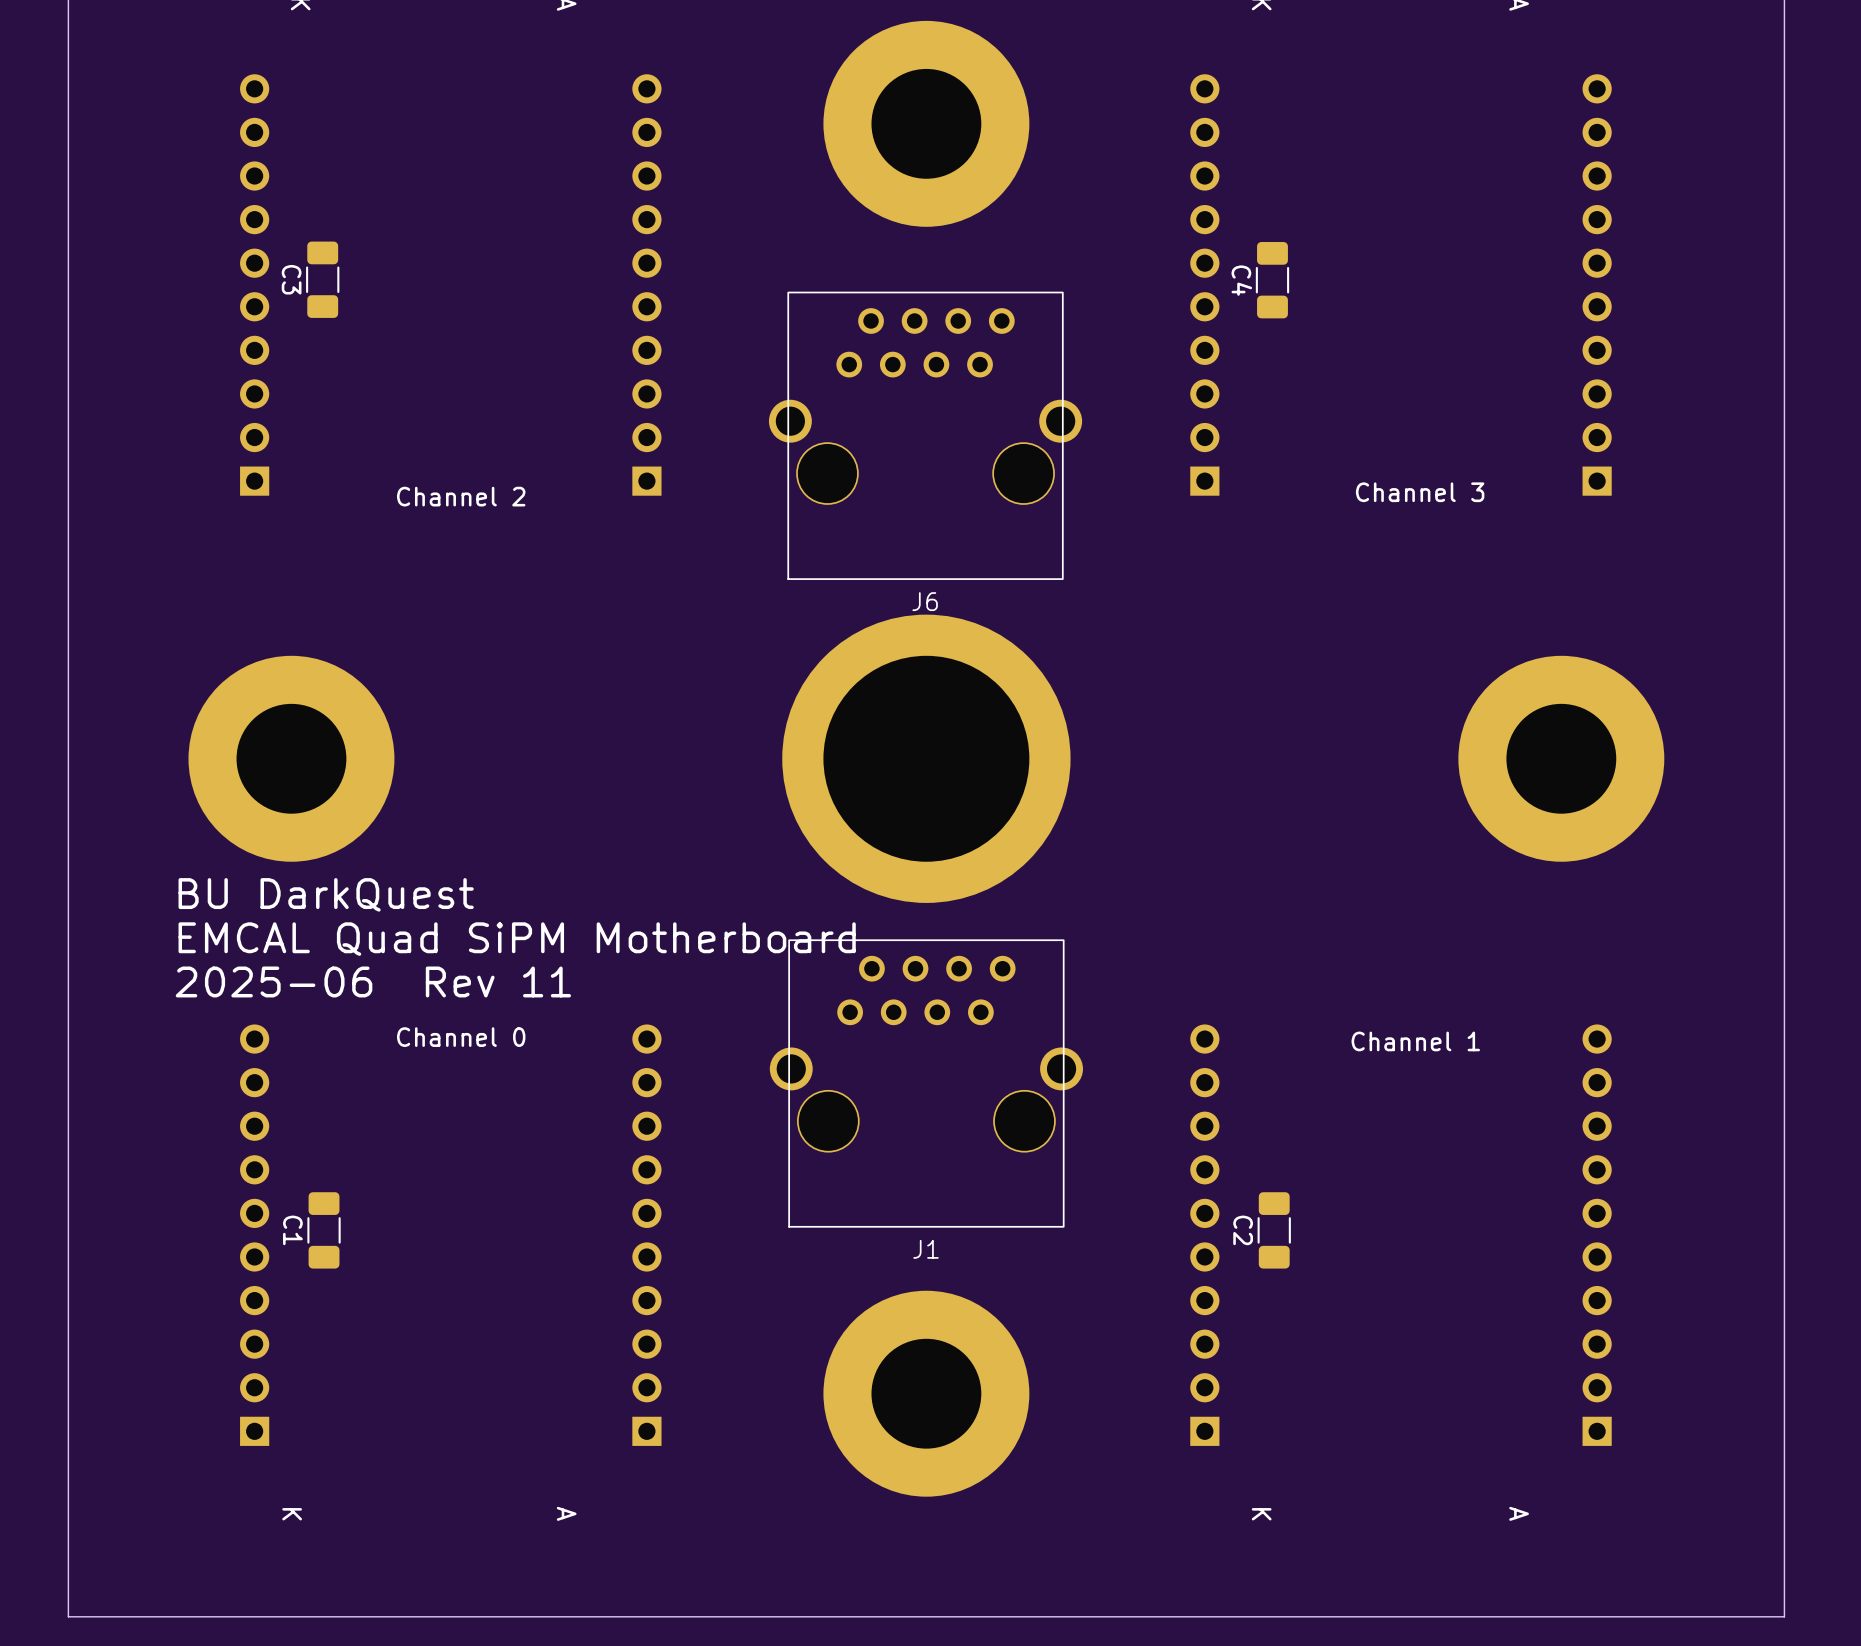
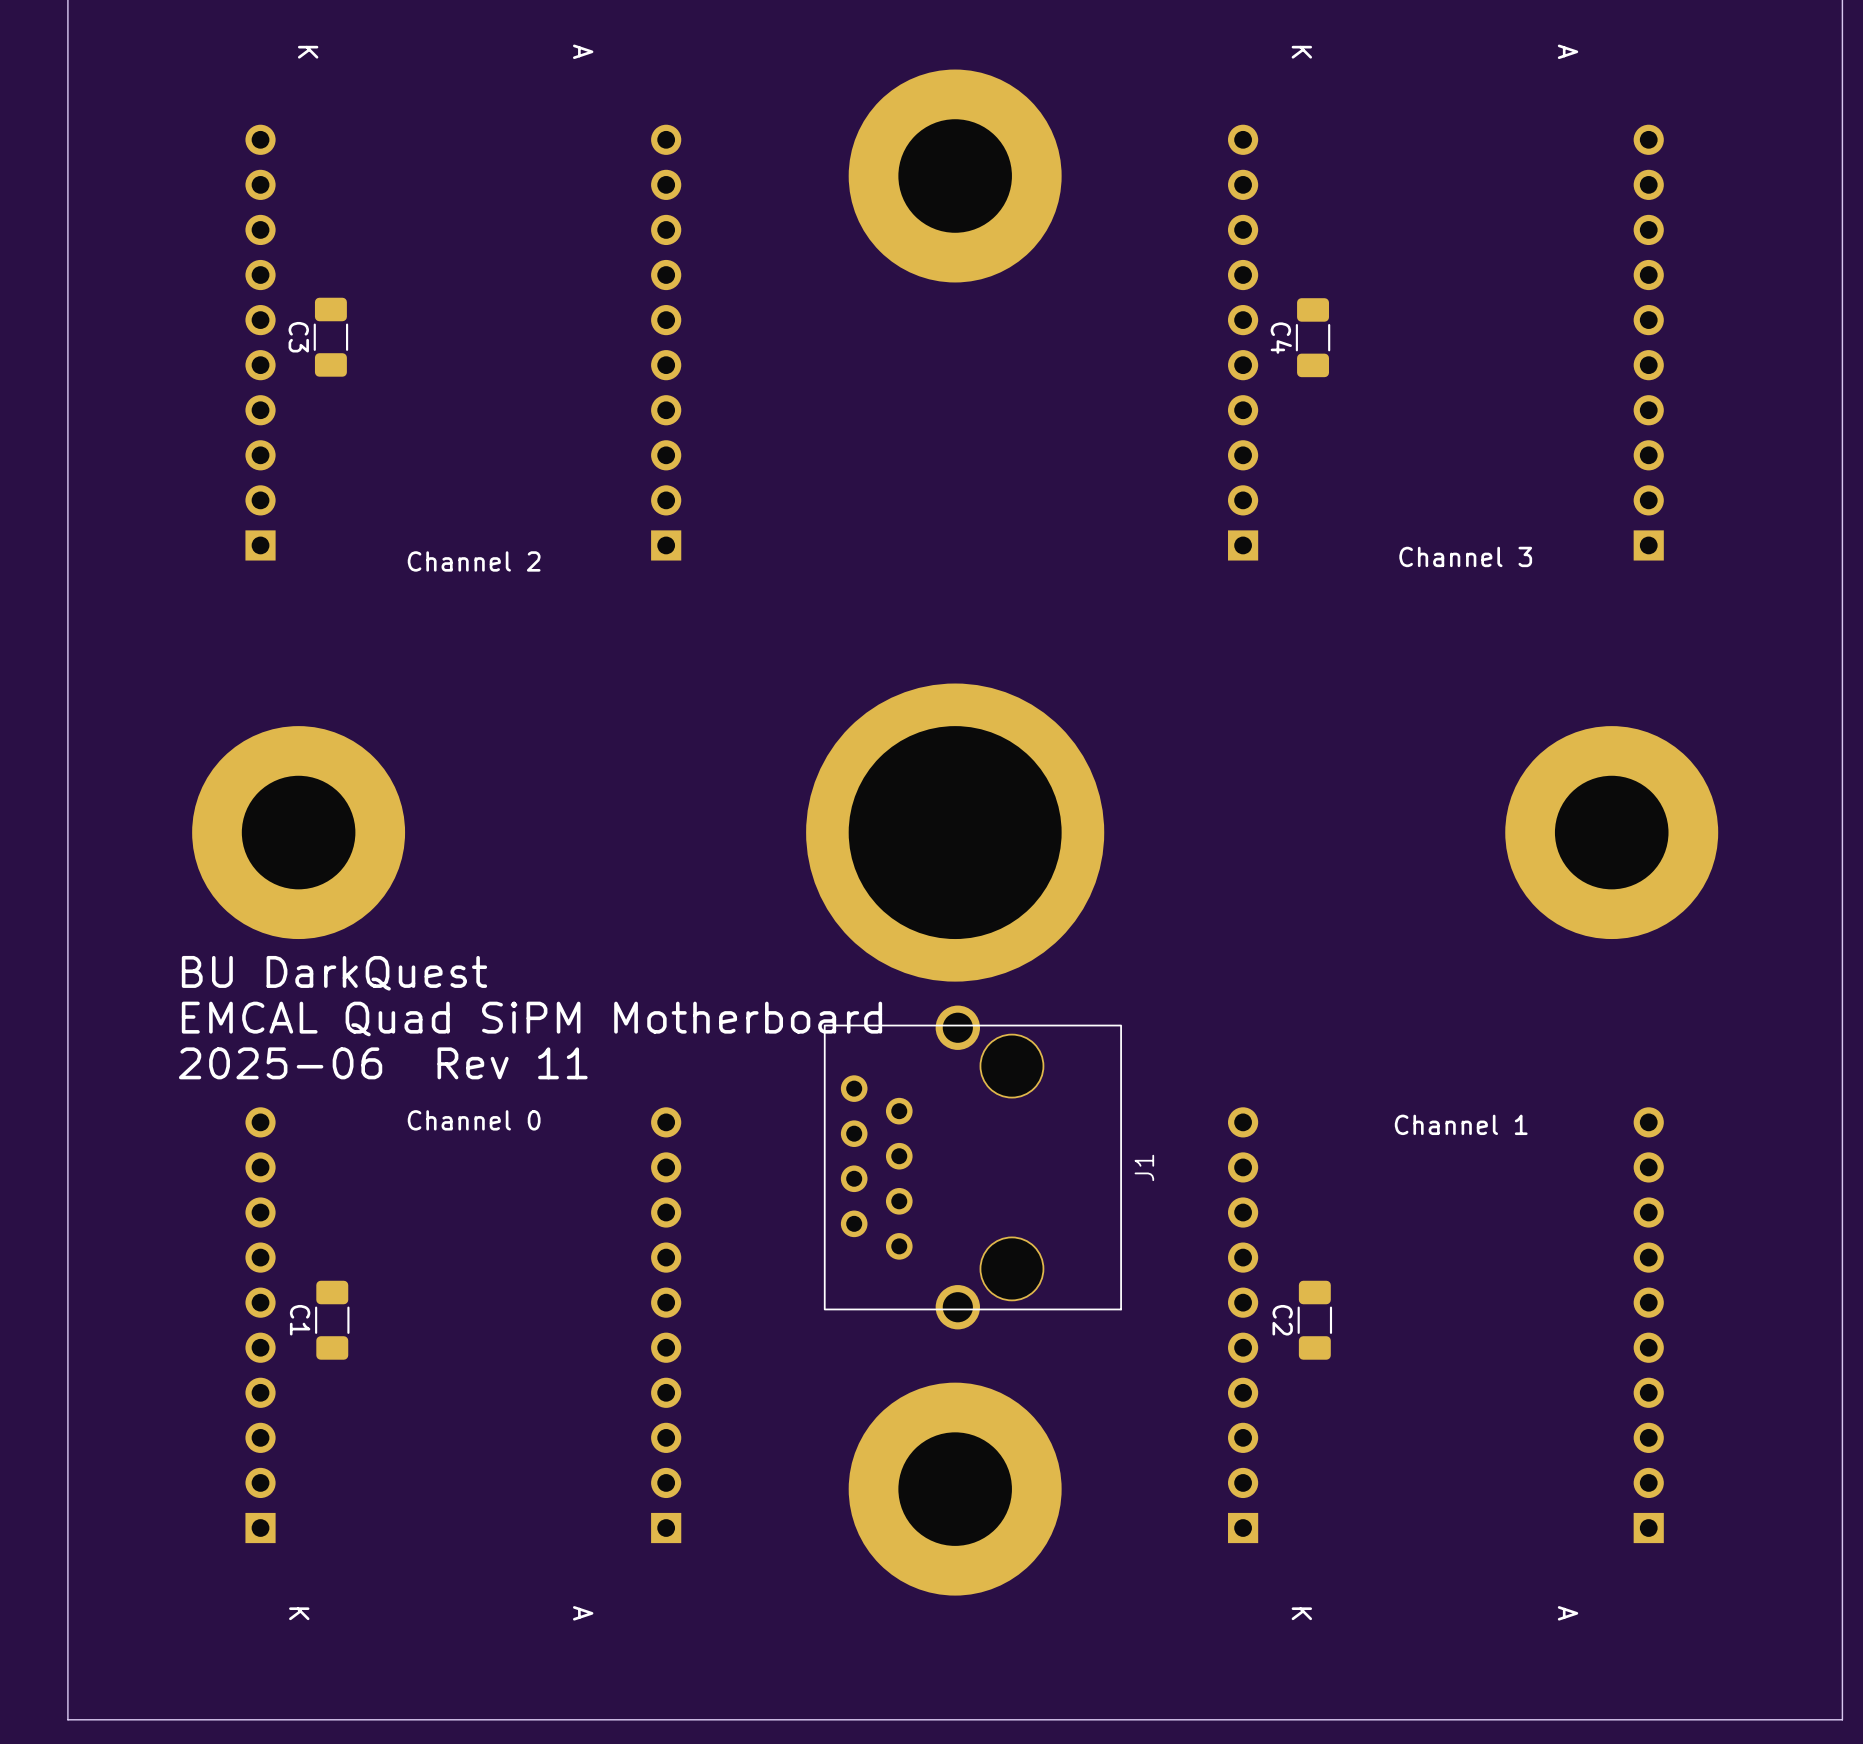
J6: (925, 435) -> none
J1 rotation: 0° (926, 1083) -> 90° counterclockwise (972, 1167)

